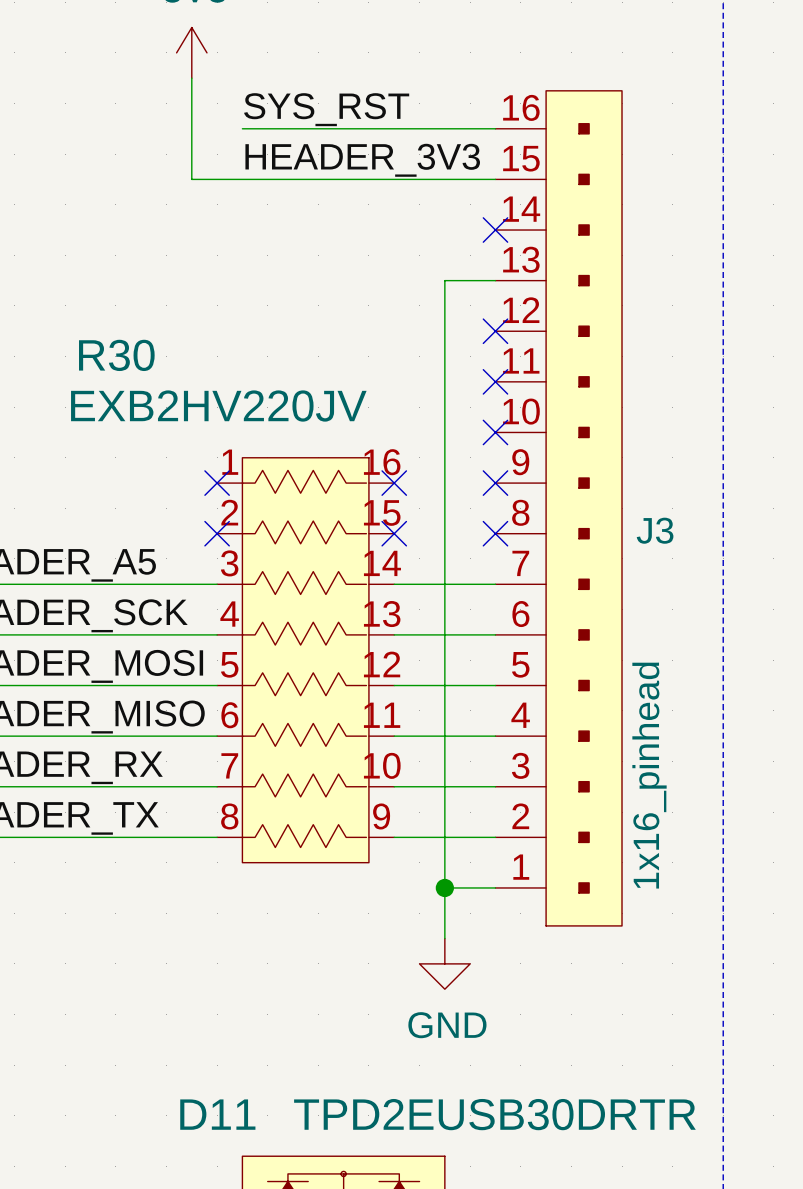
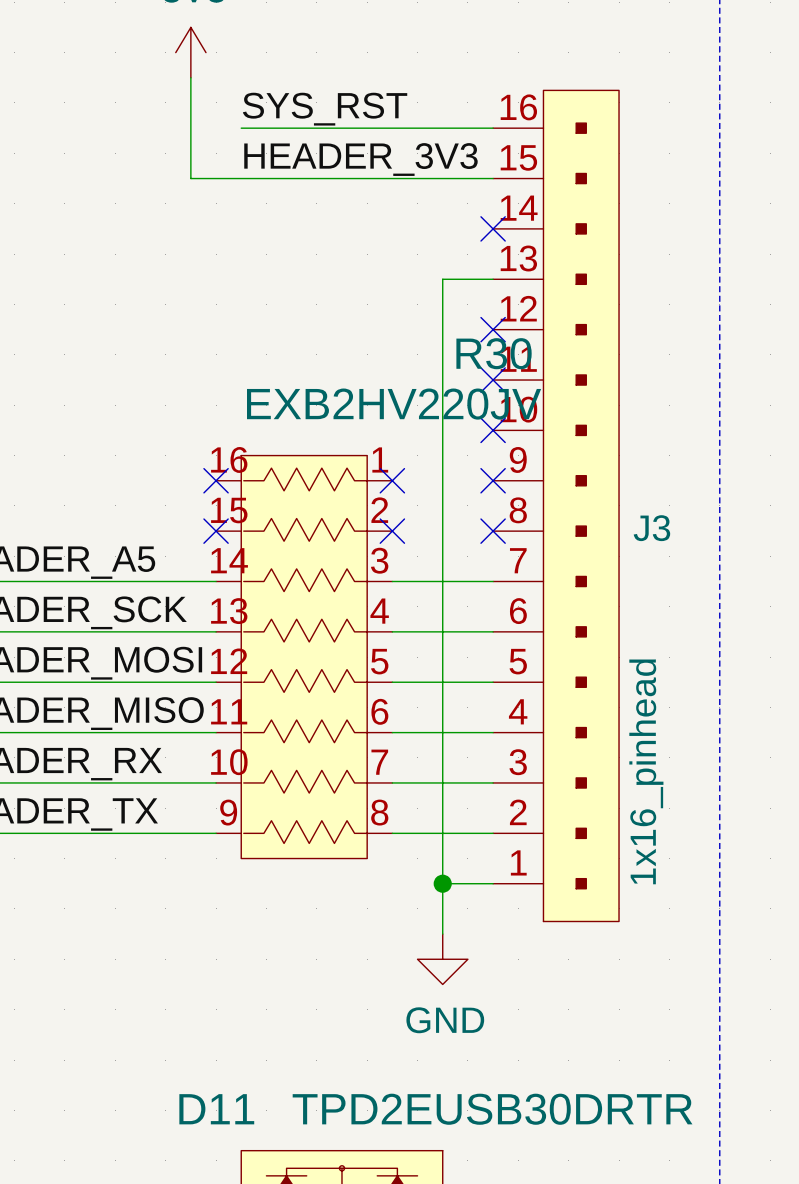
R30 flip: as is (305, 660) -> left-right (304, 657)

